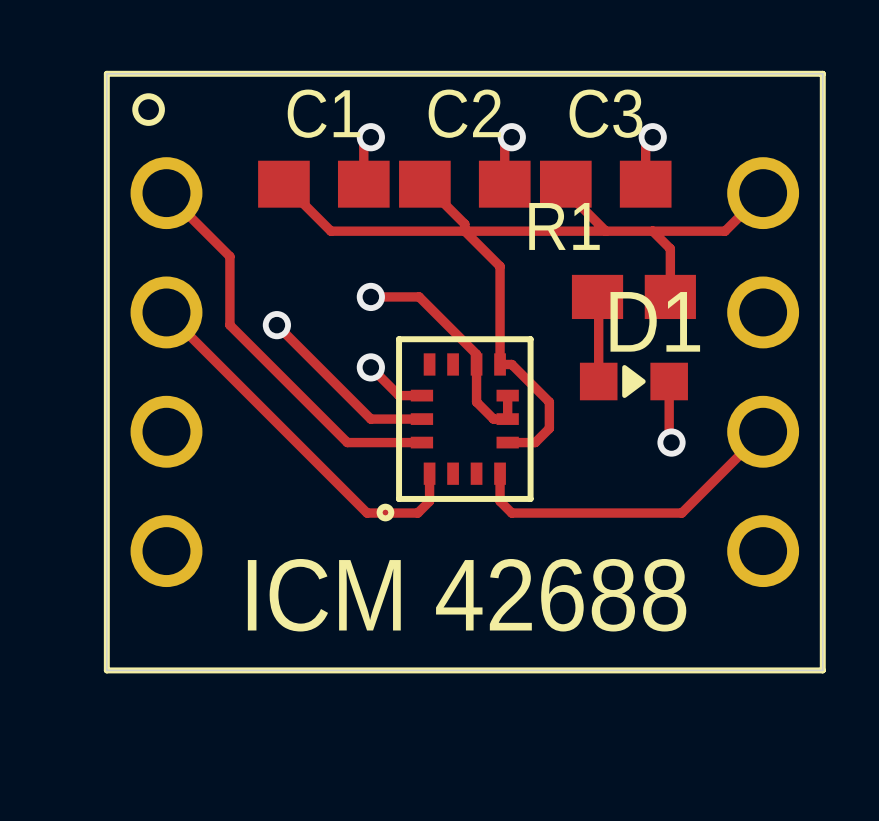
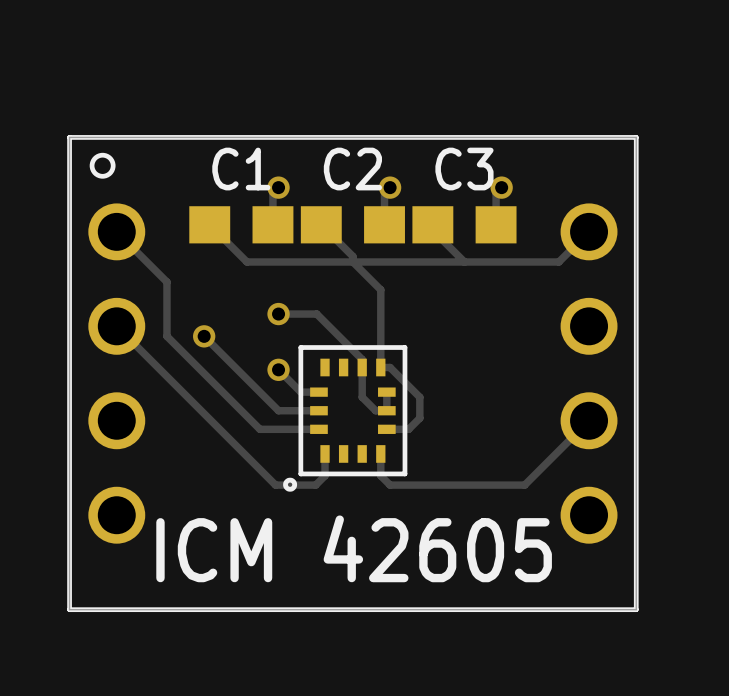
track: (652, 231) (670, 248) (670, 296) -> none
track: (597, 296) (598, 381) -> none
R1: (633, 296) -> none
D1: (633, 381) -> none
track: (669, 381) (669, 440) (671, 442) -> none
via: (671, 442) -> none
text: ICM 42688 (467, 595) -> ICM 42605 (354, 548)

